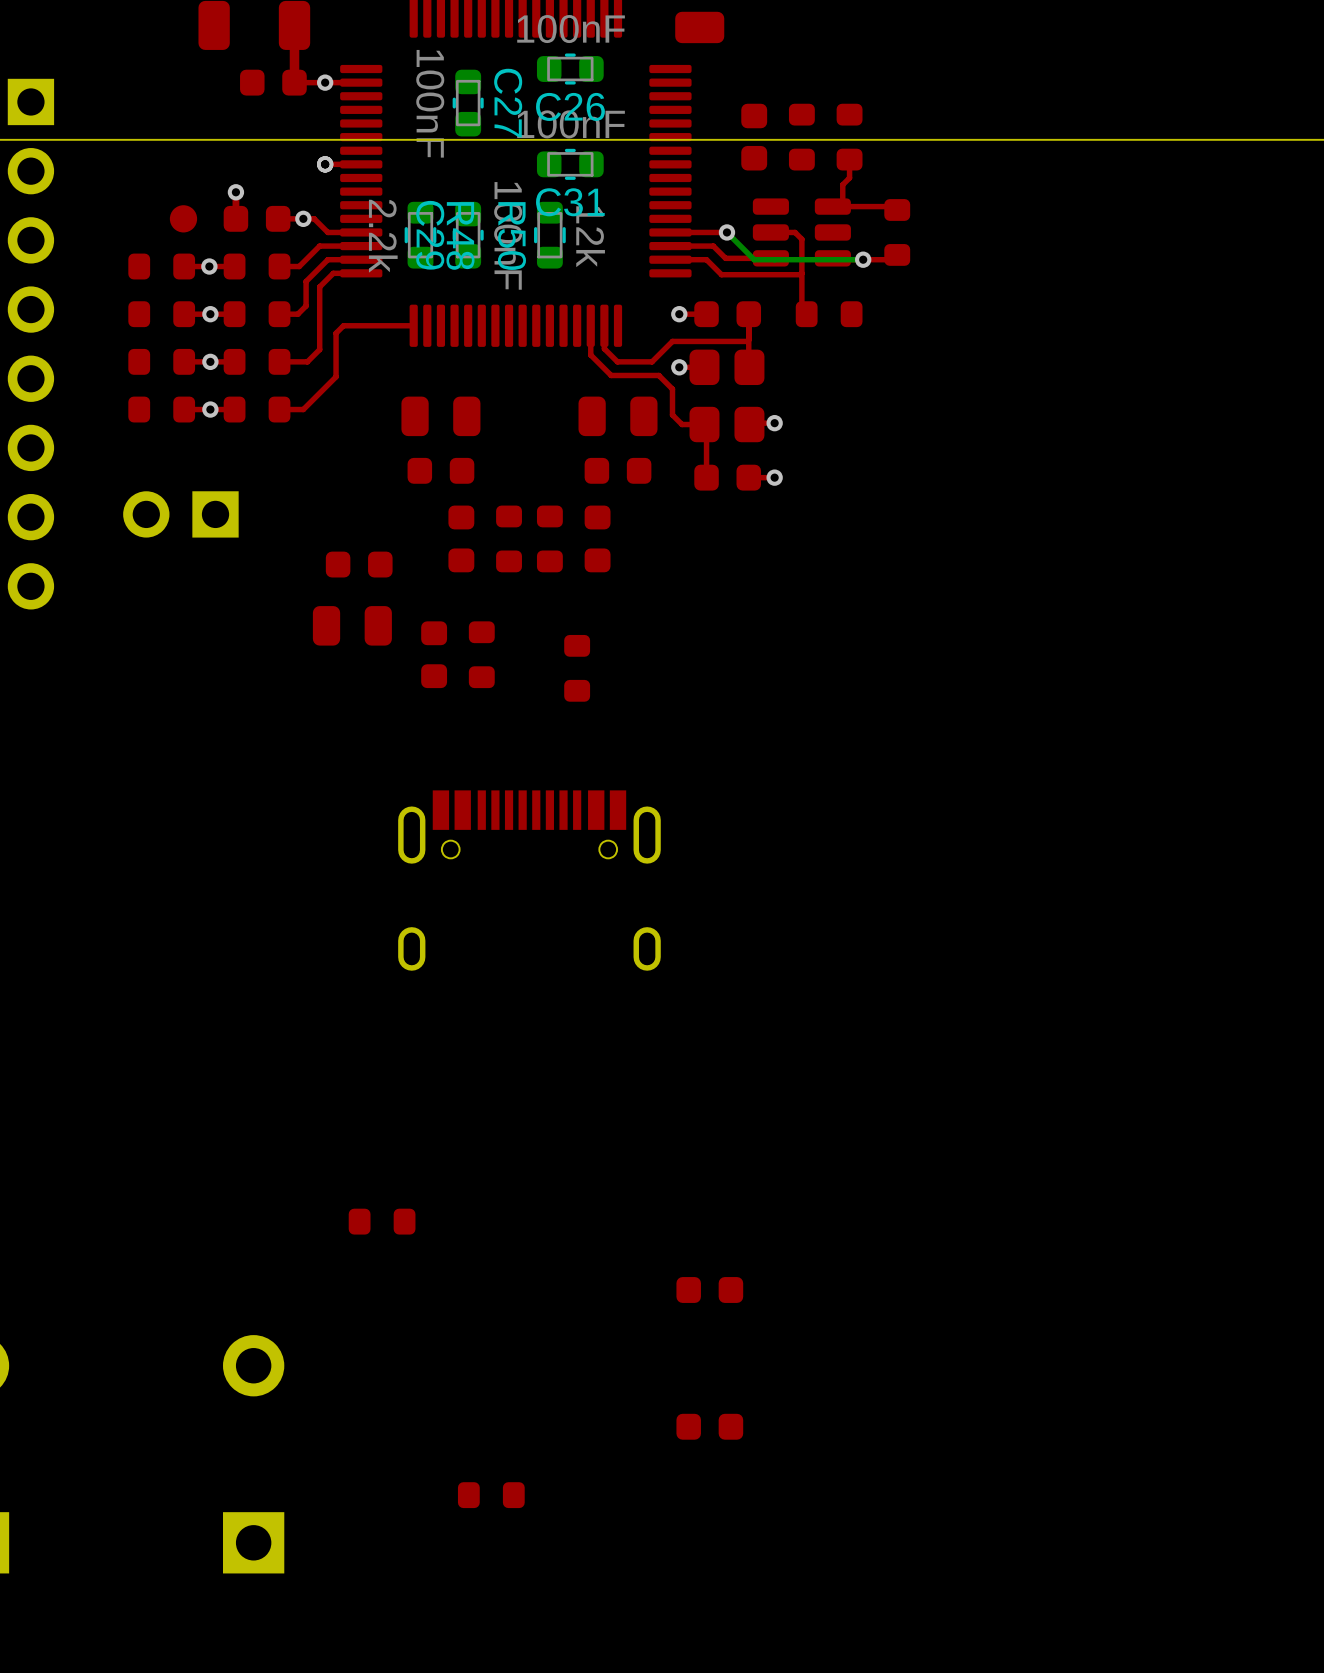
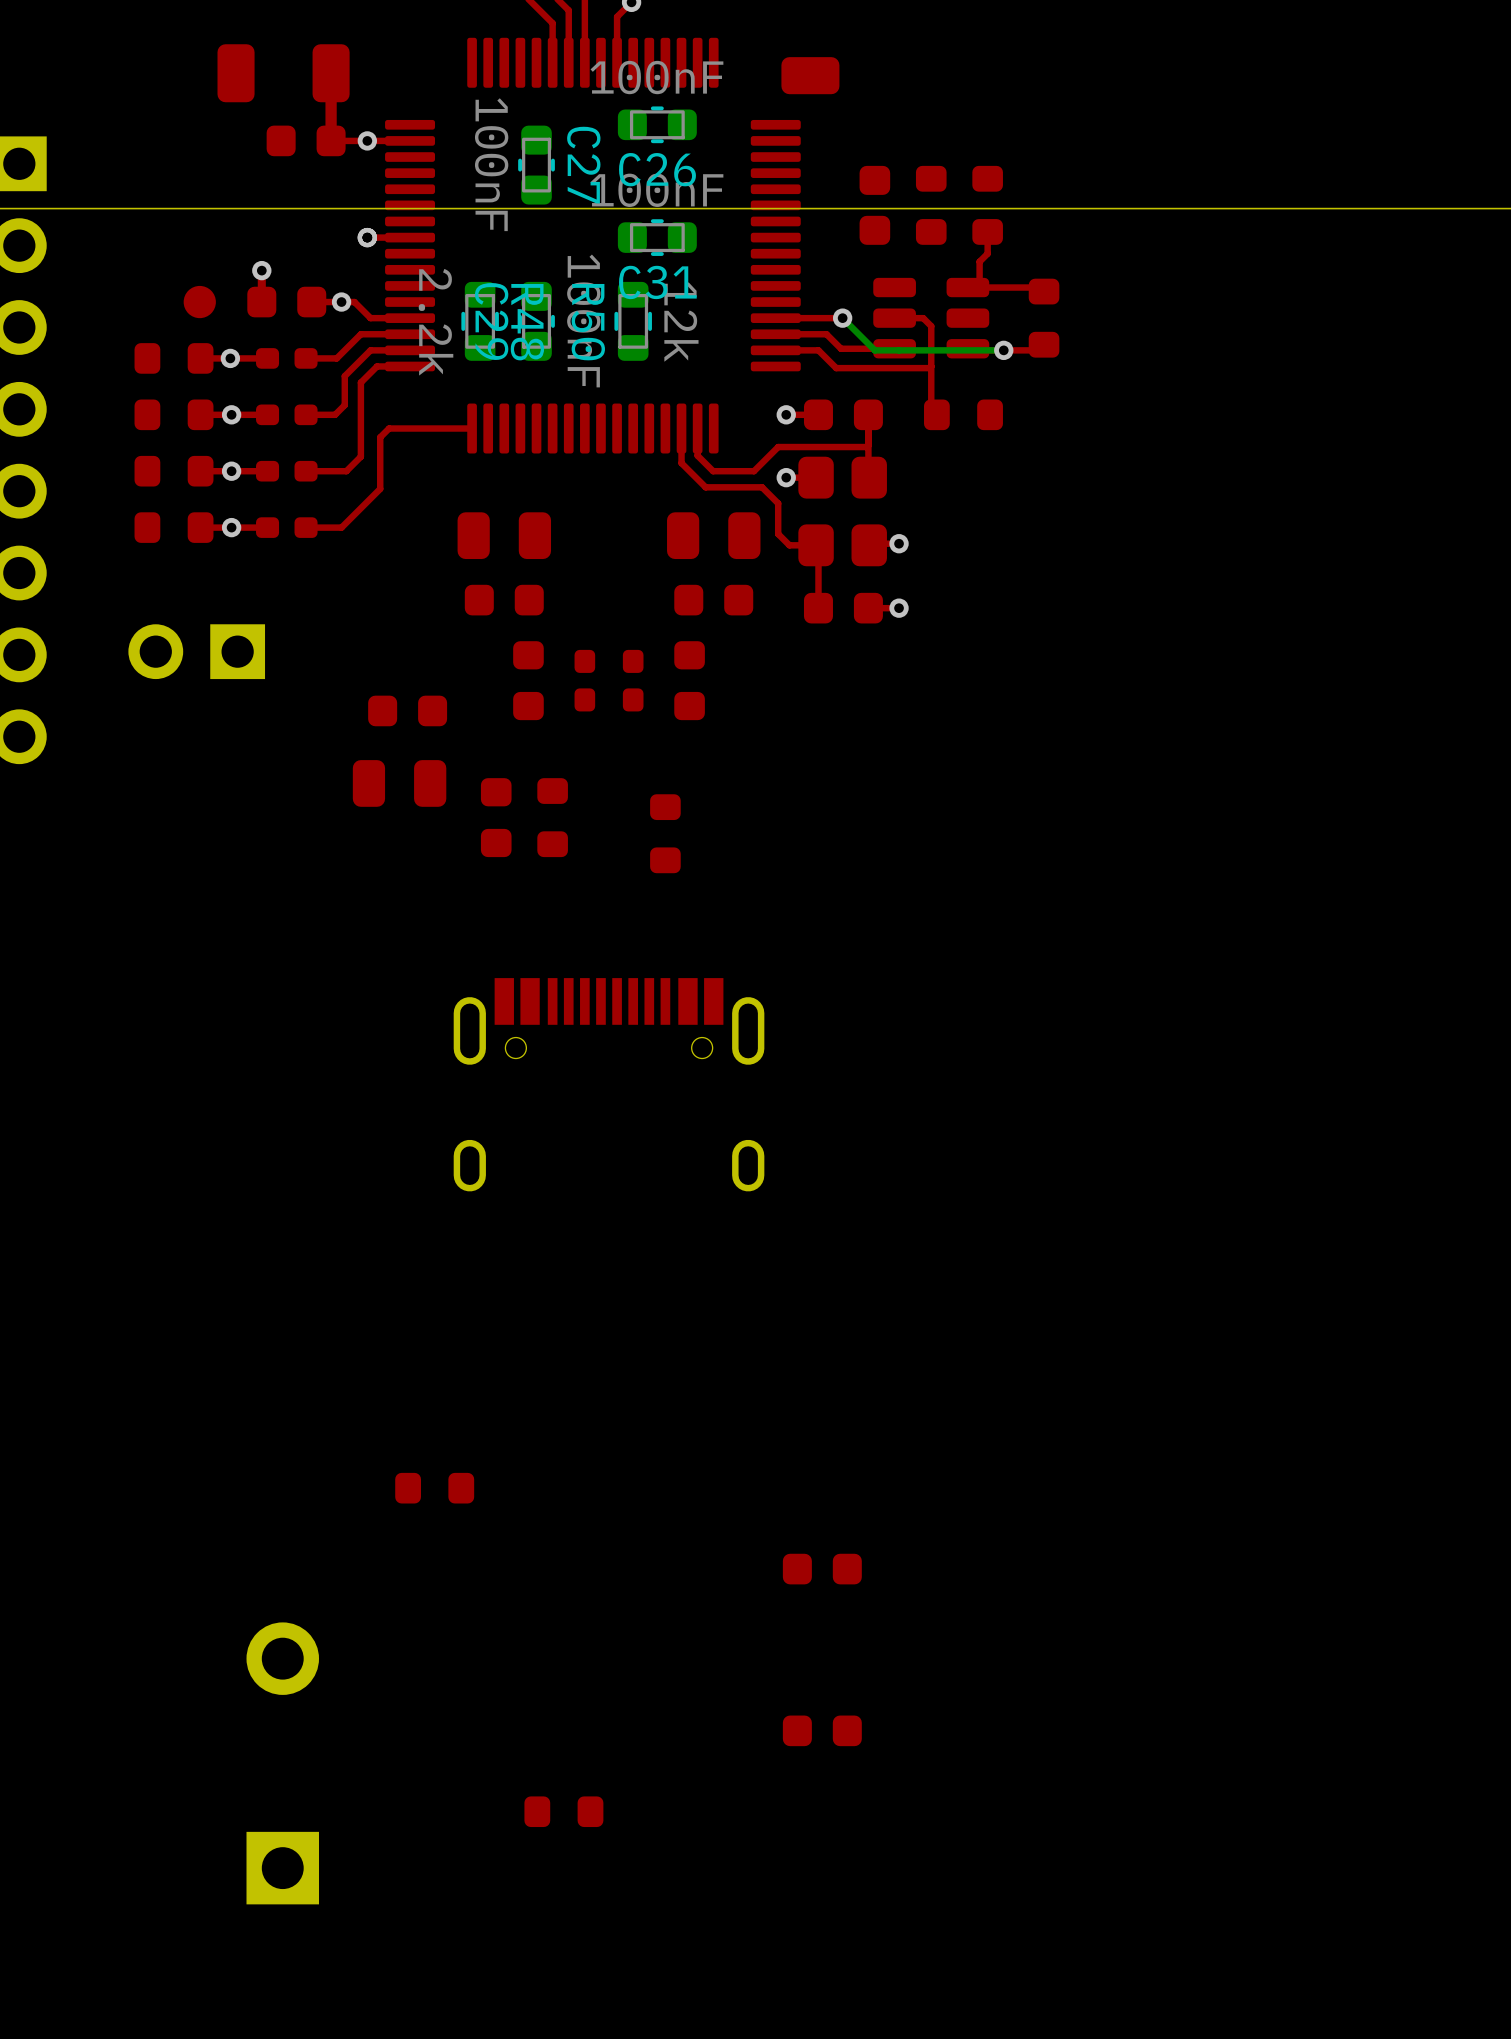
part footprint: [223, 253, 291, 280] -> [256, 348, 318, 369]
part footprint: [223, 301, 291, 328] -> [256, 404, 318, 426]
part footprint: [223, 348, 291, 375] -> [256, 460, 318, 482]
part footprint: [223, 396, 291, 423] -> [256, 517, 318, 538]
part footprint: [496, 505, 522, 573] -> [574, 649, 596, 712]
part footprint: [536, 505, 563, 573] -> [622, 649, 644, 712]

